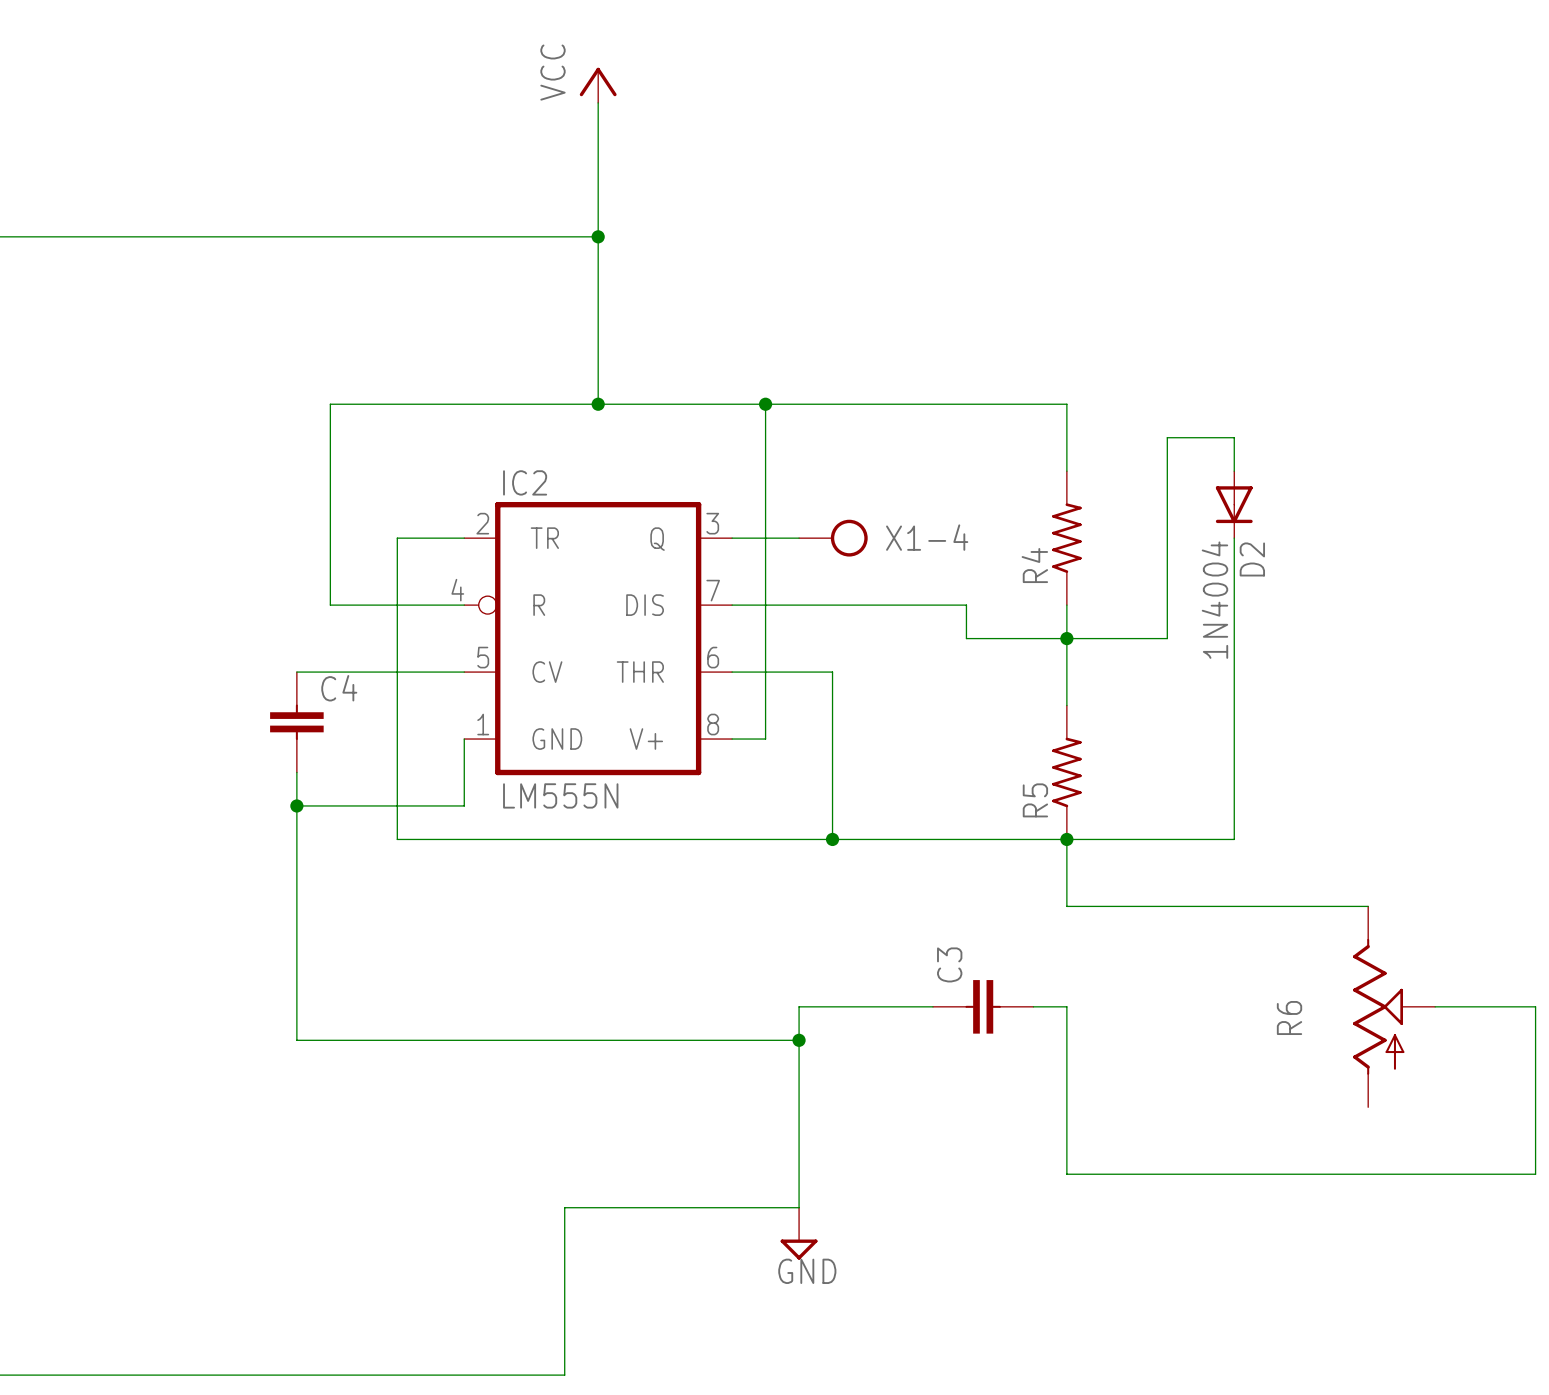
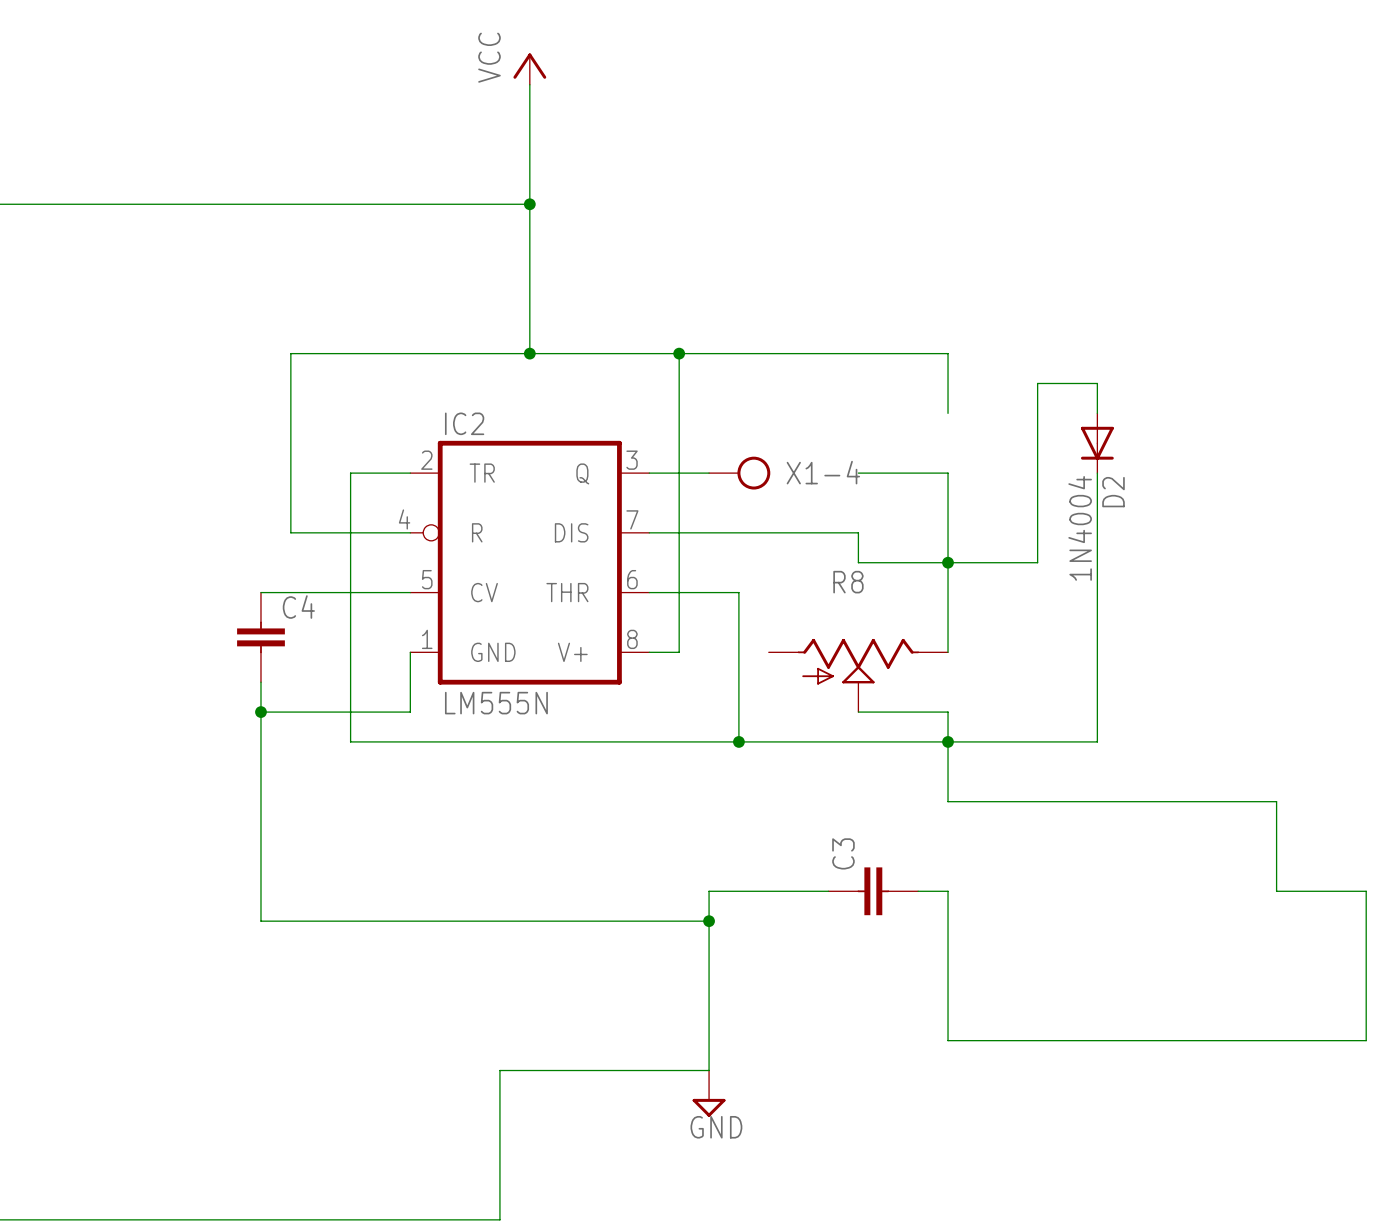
wire: none -> (858, 473) (948, 473) (948, 532)
R4: (1066, 538) -> none
R8: none -> (858, 675)
R5: (1066, 772) -> none
wire: none -> (858, 712) (948, 712) (948, 741)
wire: none -> (1216, 801) (1276, 801) (1276, 891)
R6: (1394, 1006) -> none

